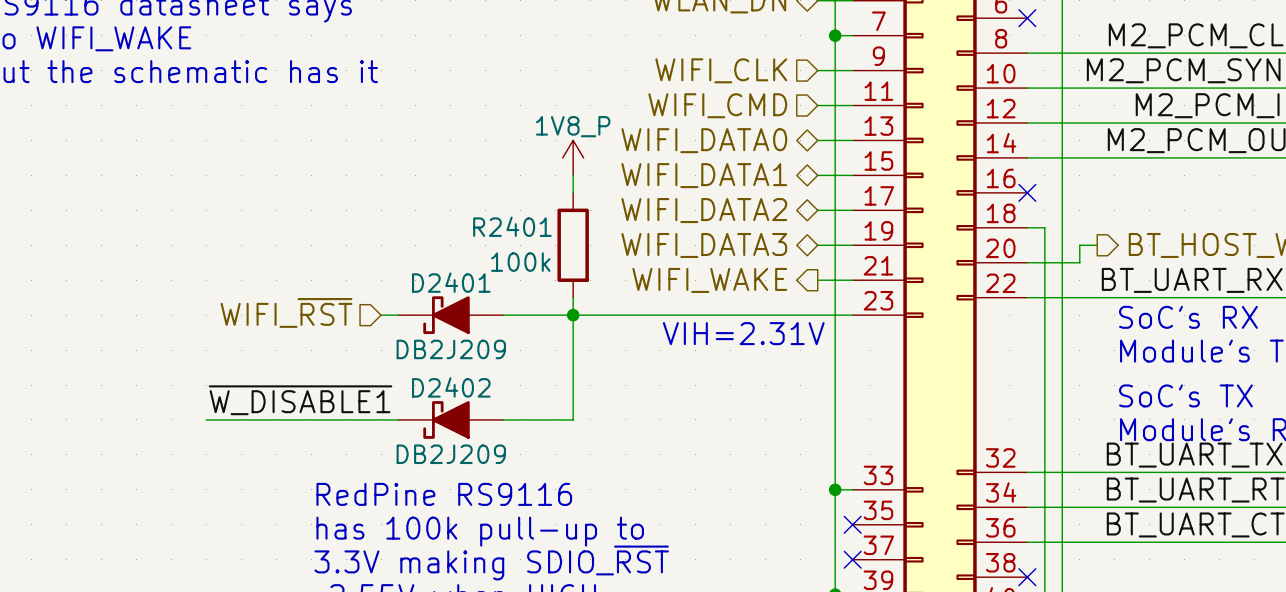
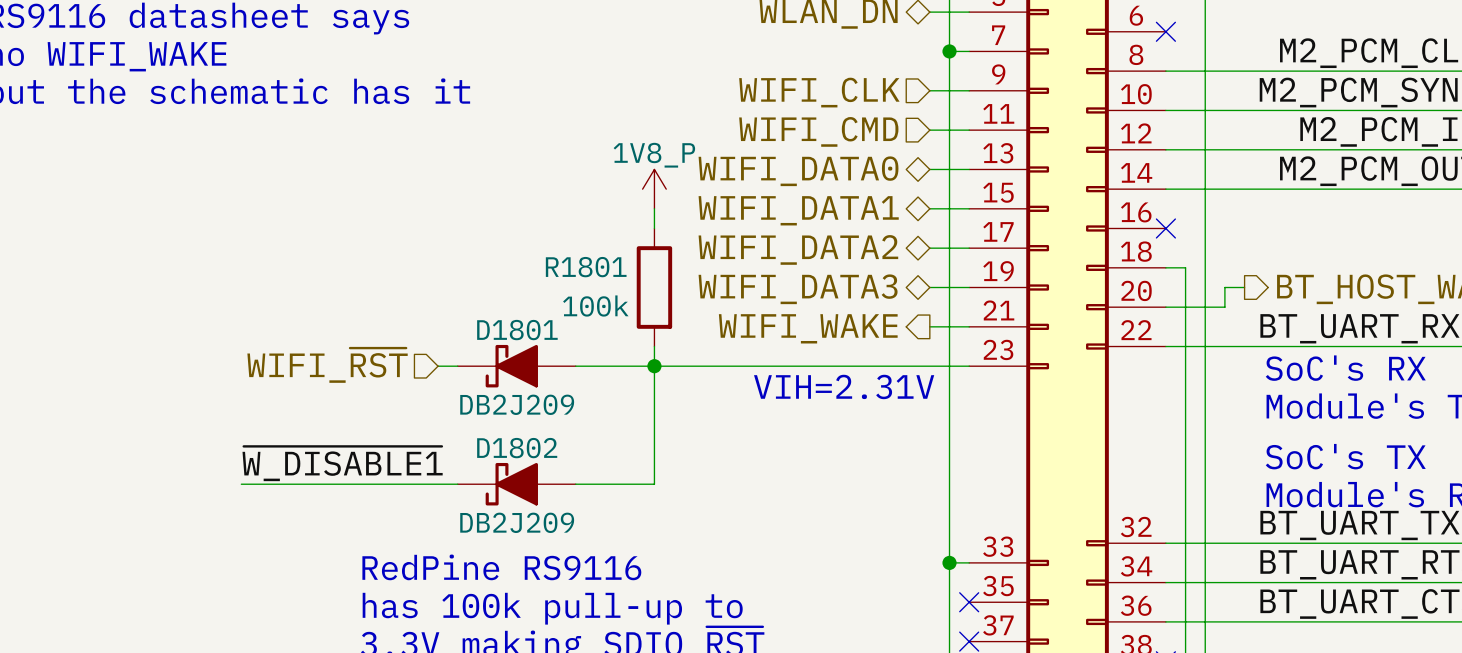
R2401 name: R2401 (512, 226) -> R1801 (586, 267)
D2401 name: D2401 (451, 282) -> D1801 (517, 330)
D2402 name: D2402 (451, 387) -> D1802 (517, 448)

